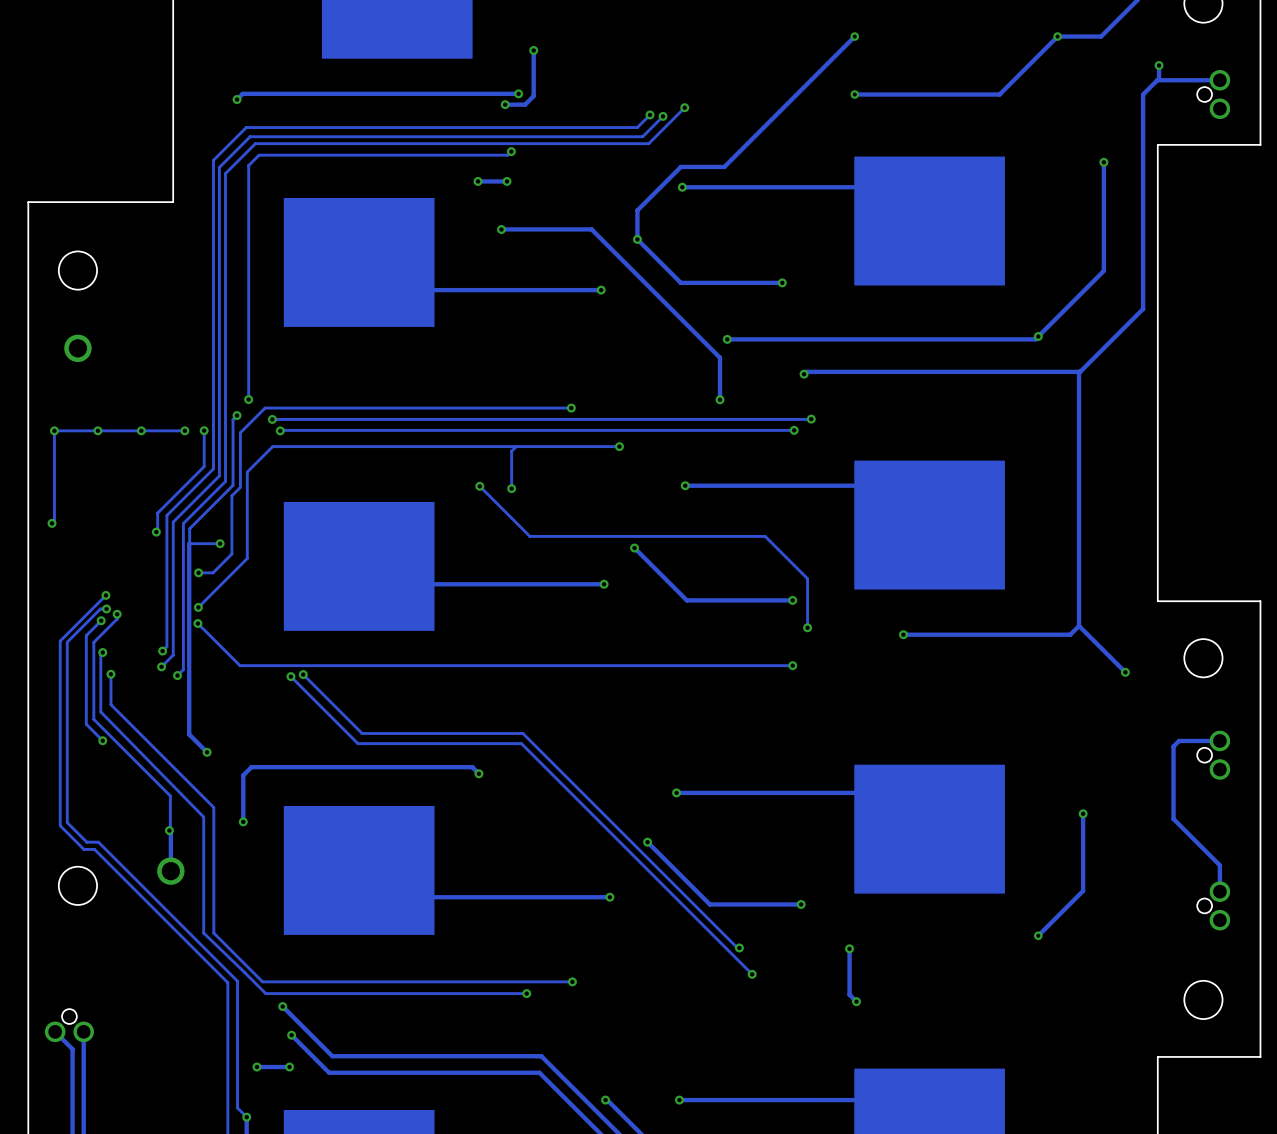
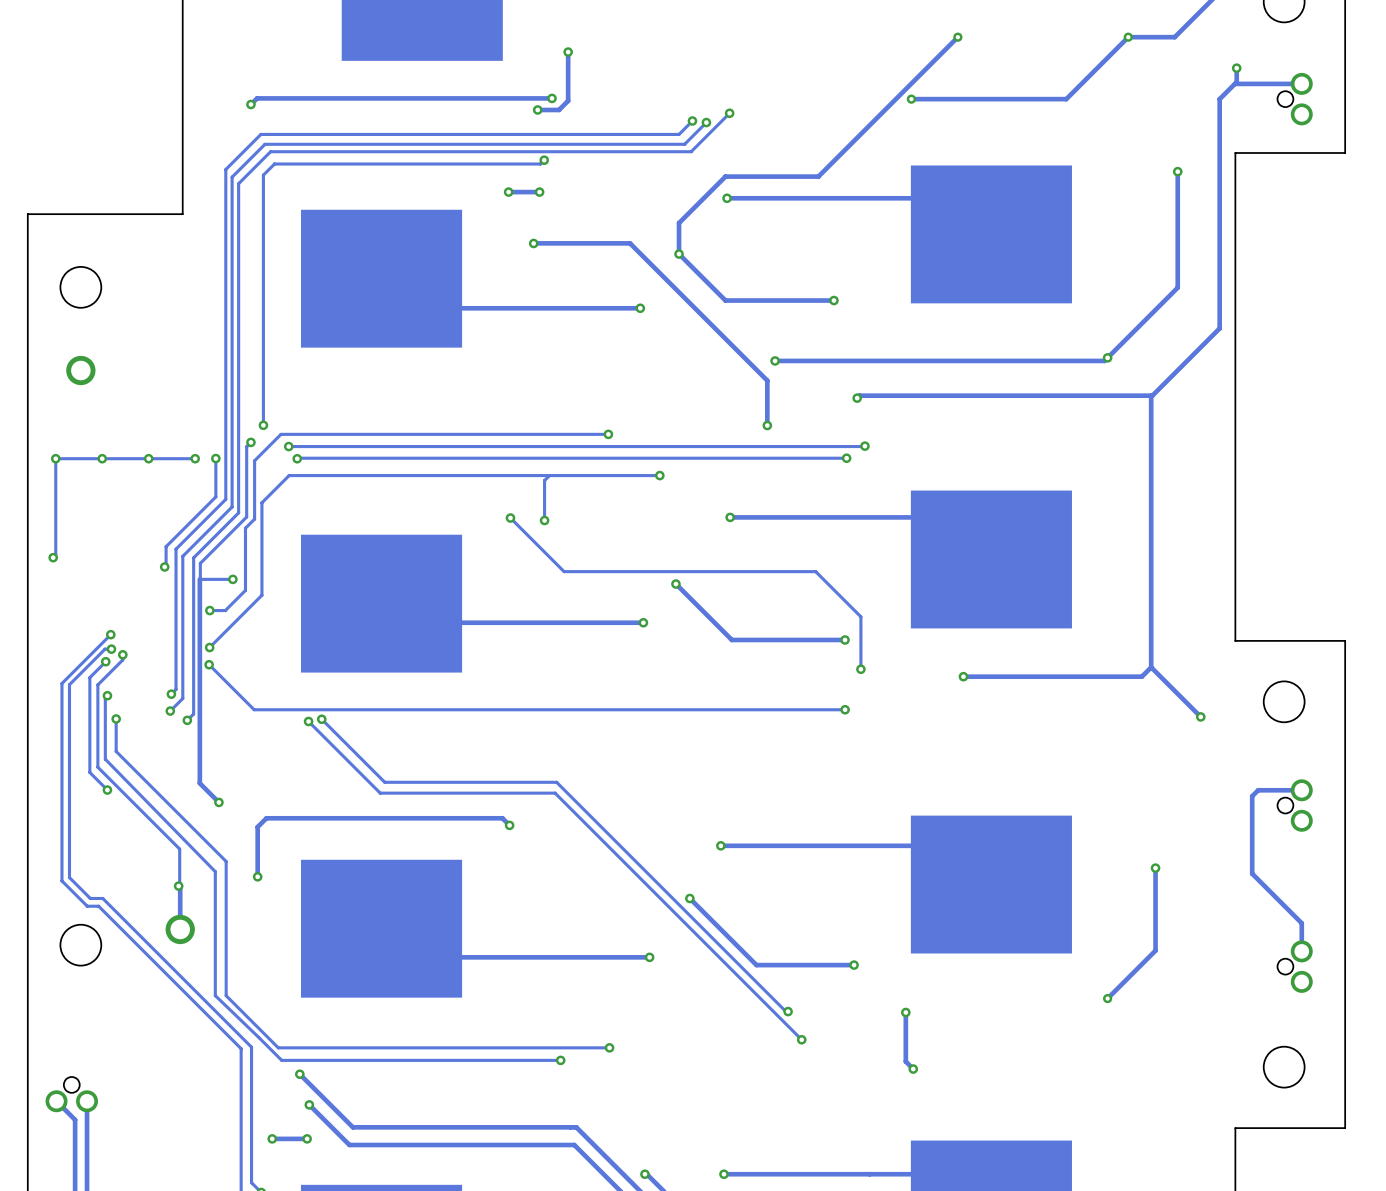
track: (854, 36) (724, 166) -> (957, 37) (818, 176) (771, 176)
via position: (854, 36) -> (957, 37)

